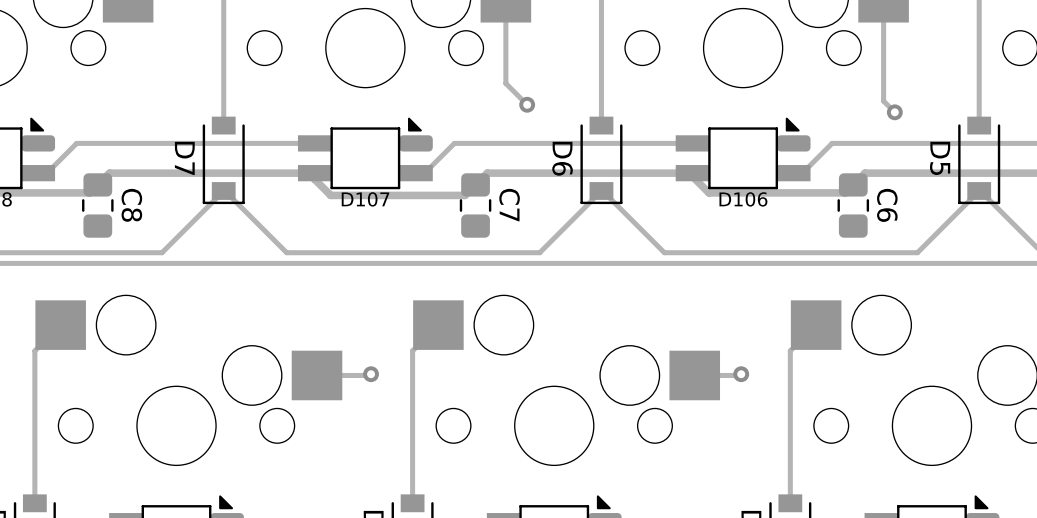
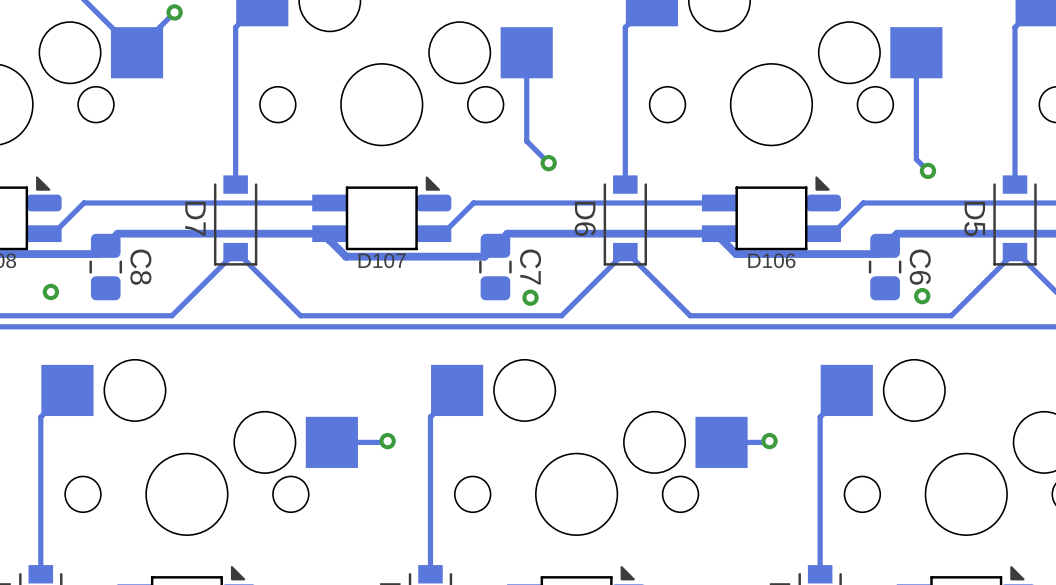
via: none -> (50, 291)
via: none -> (922, 296)
via: none -> (530, 297)

